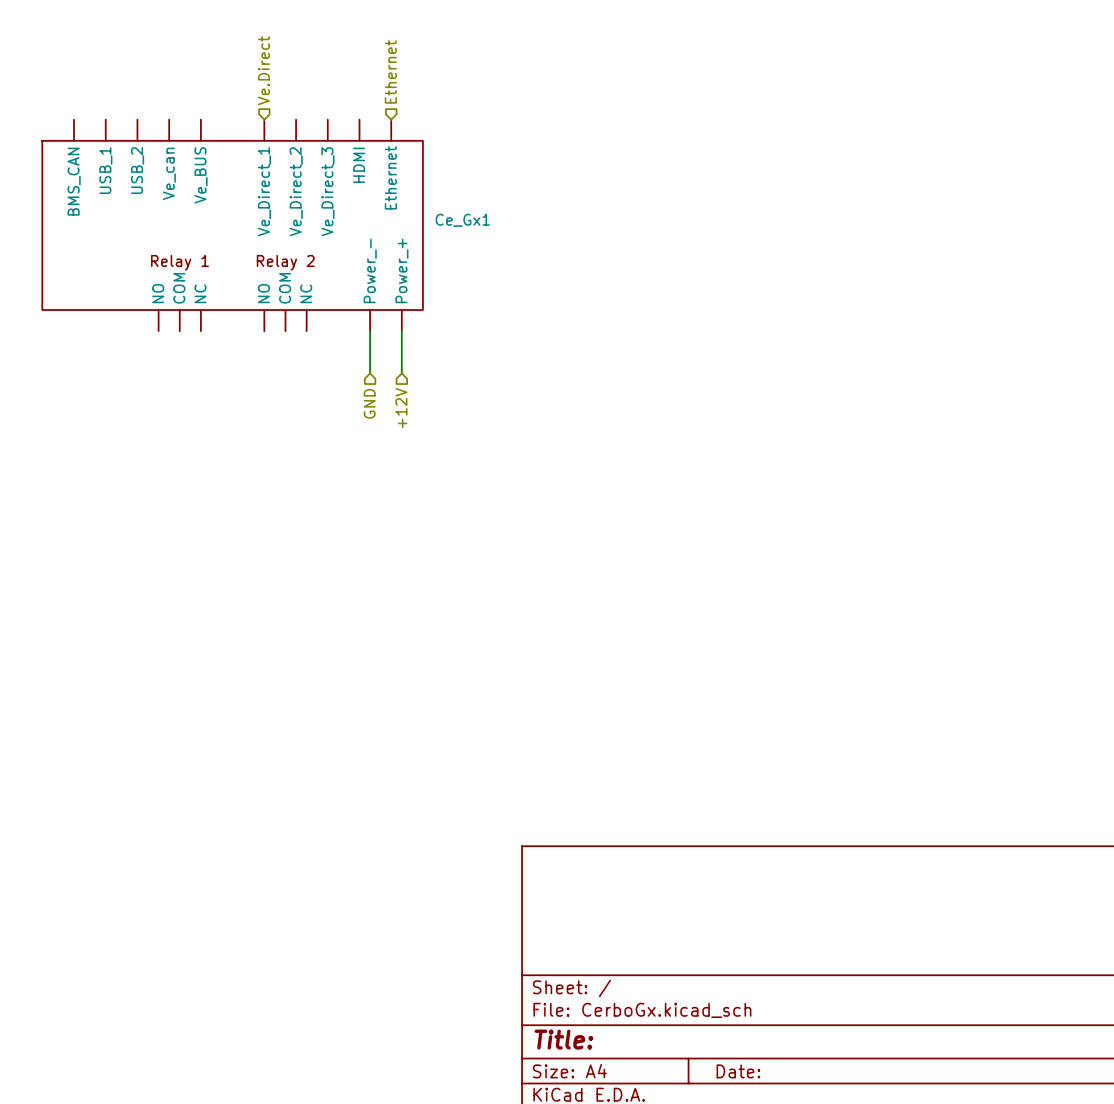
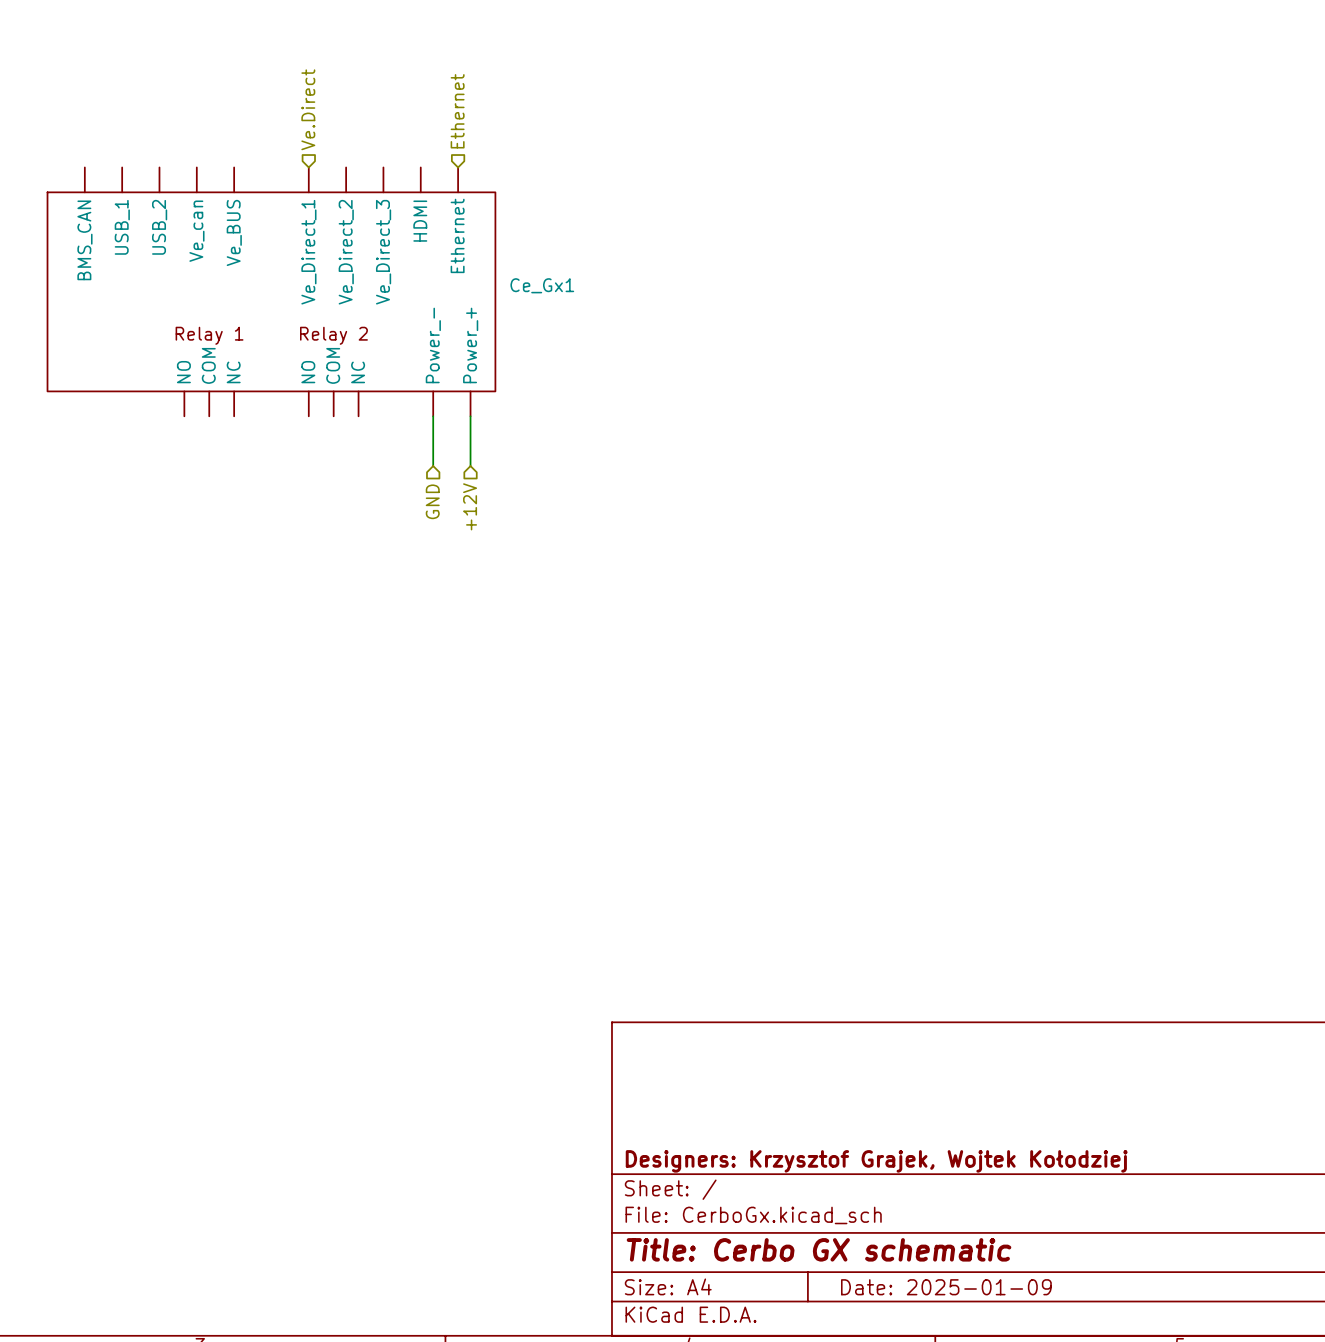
title block: none -> Designers: Krzysztof Grajek, Wojtek Kołodziej (876, 1161)
title block: Title: (563, 1039) -> Title: Cerbo GX schematic (819, 1249)
title block: Date: (738, 1071) -> Date: 2025-01-09 (946, 1287)

